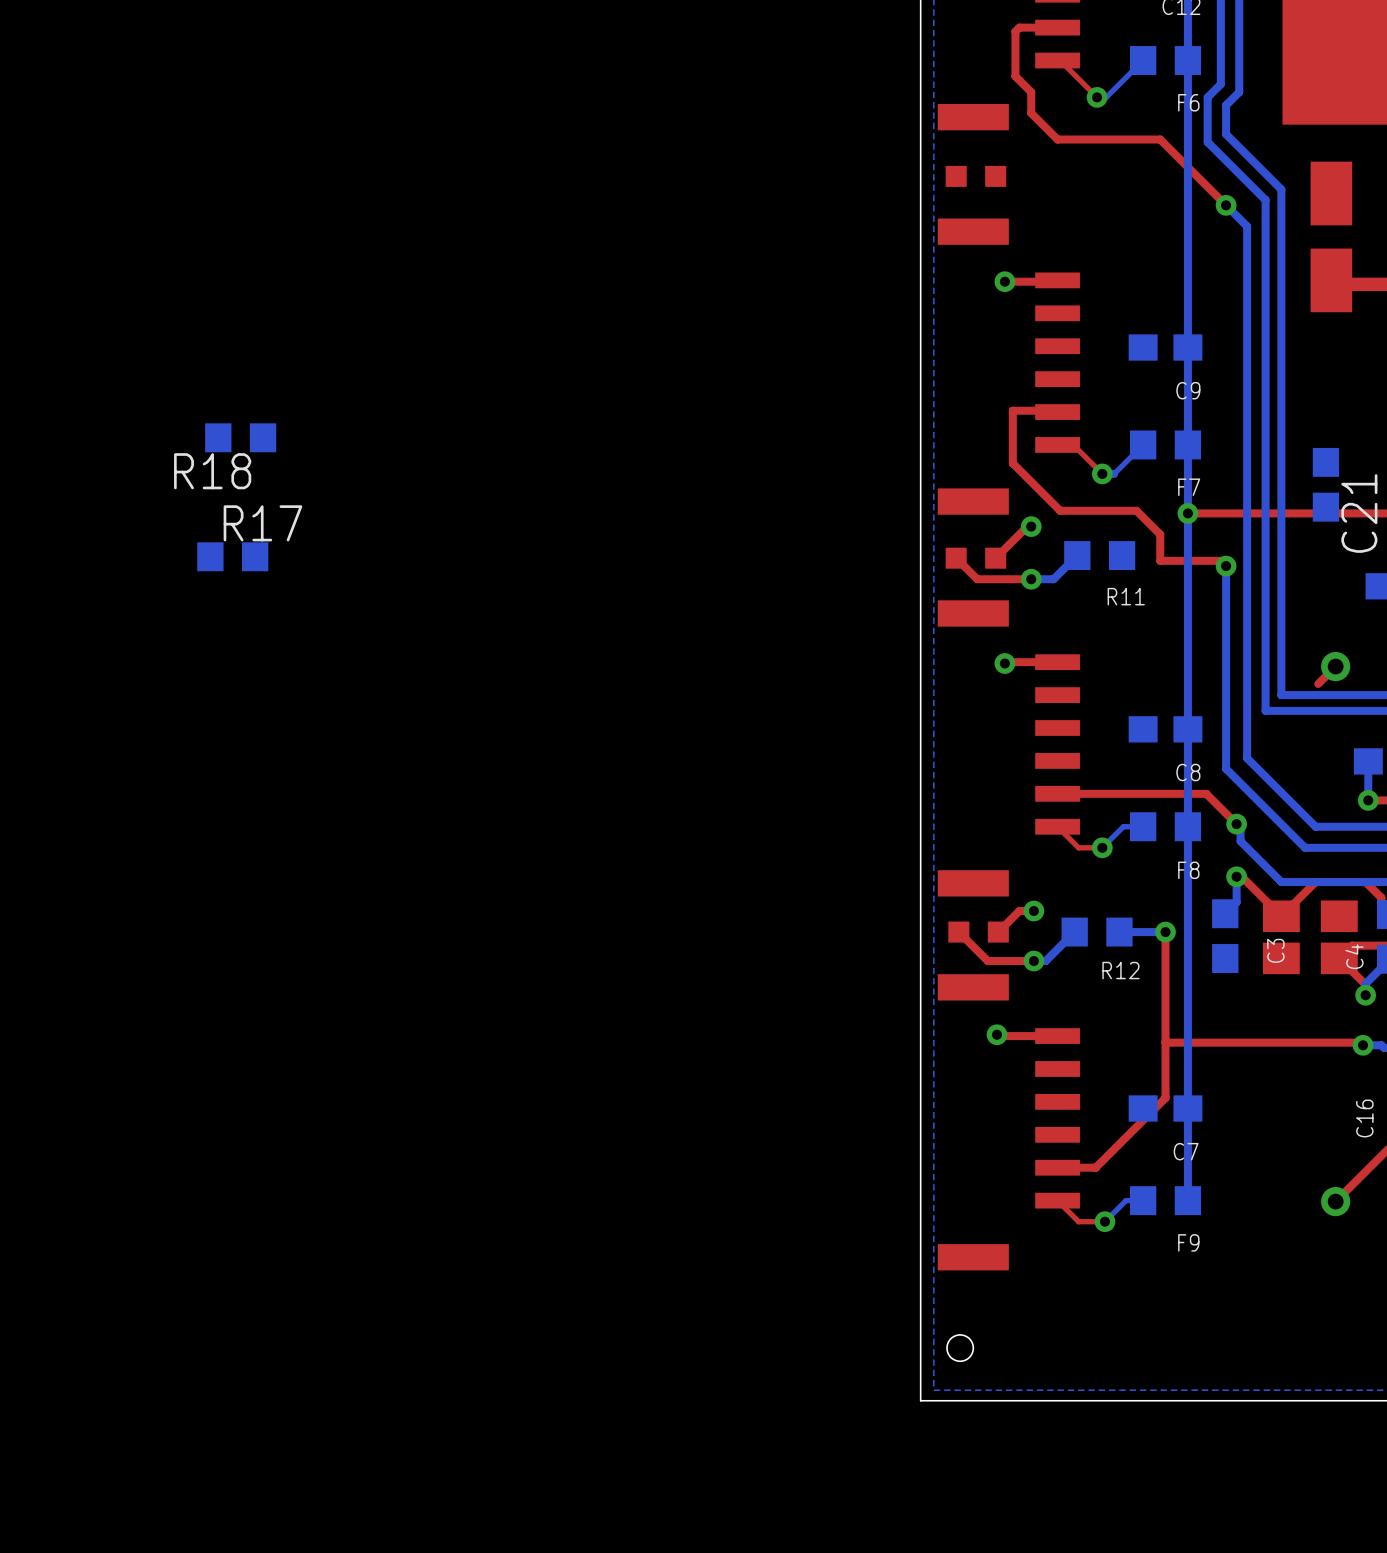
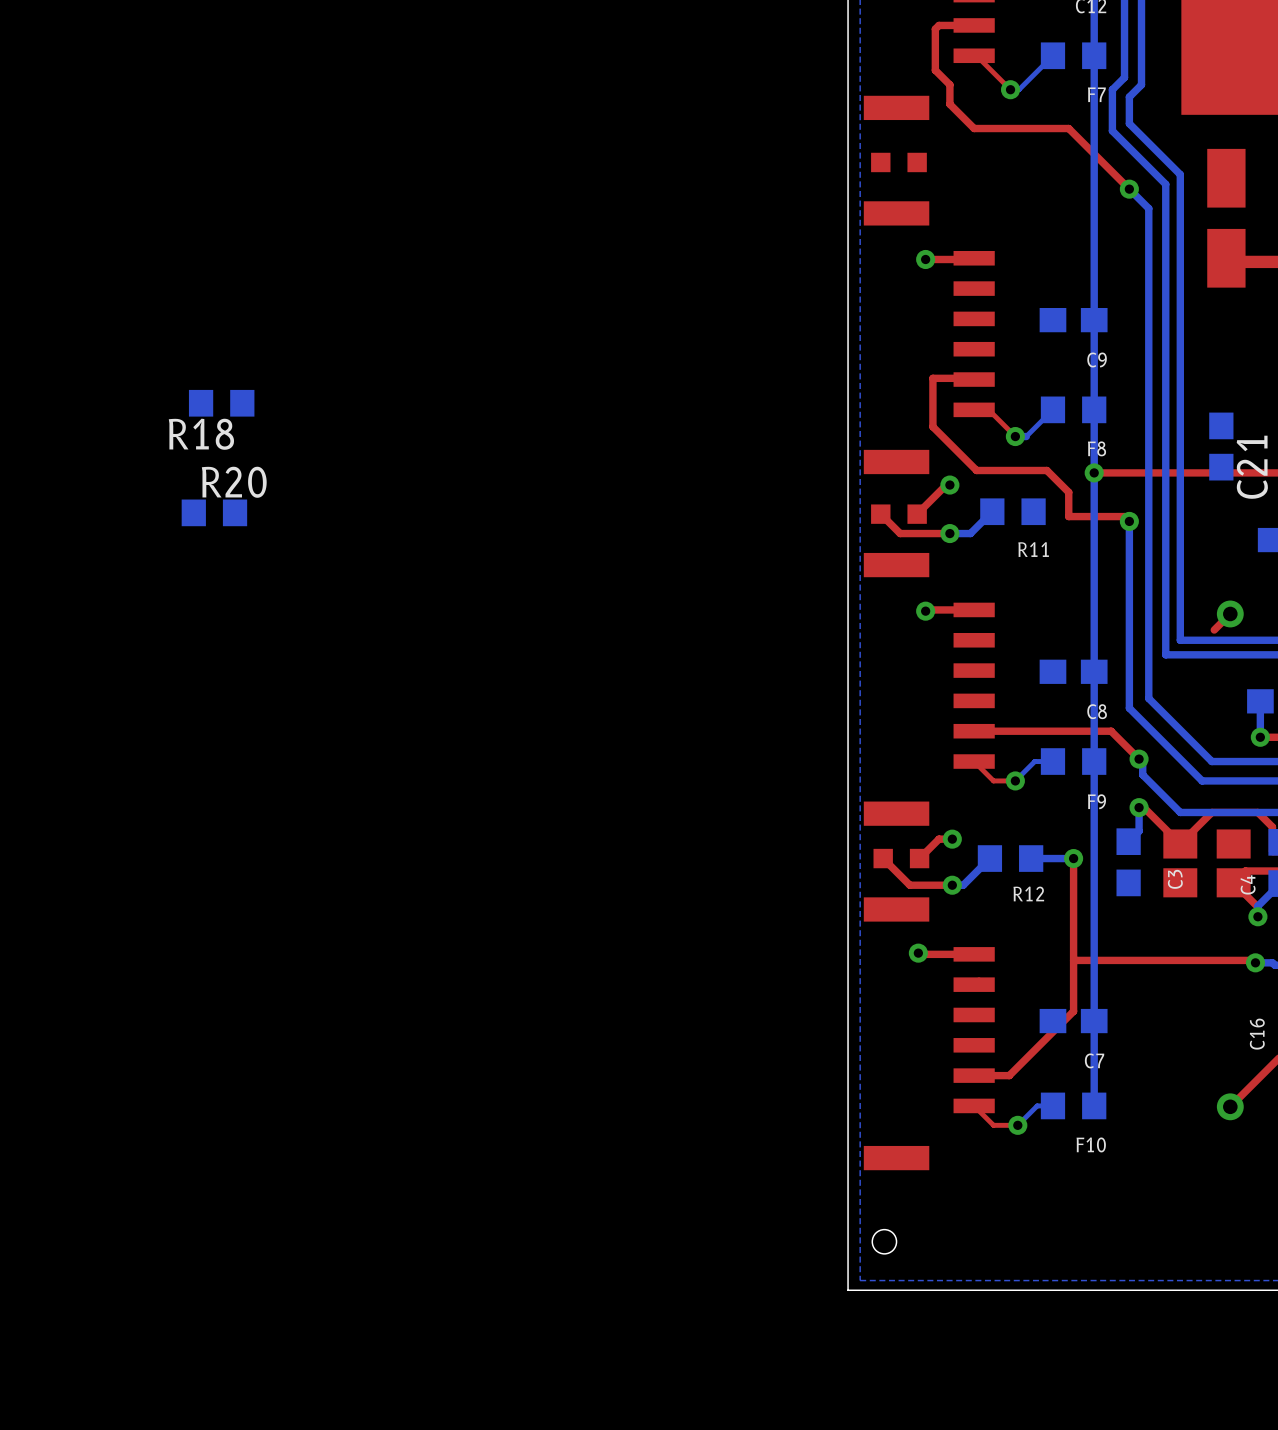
F6 name: F6 (1188, 102) -> F7 (1096, 94)
F7 name: F7 (1189, 487) -> F8 (1097, 448)
R17 name: R17 (262, 523) -> R20 (234, 482)
F8 name: F8 (1188, 870) -> F9 (1096, 801)
F9 name: F9 (1188, 1242) -> F10 (1091, 1144)

